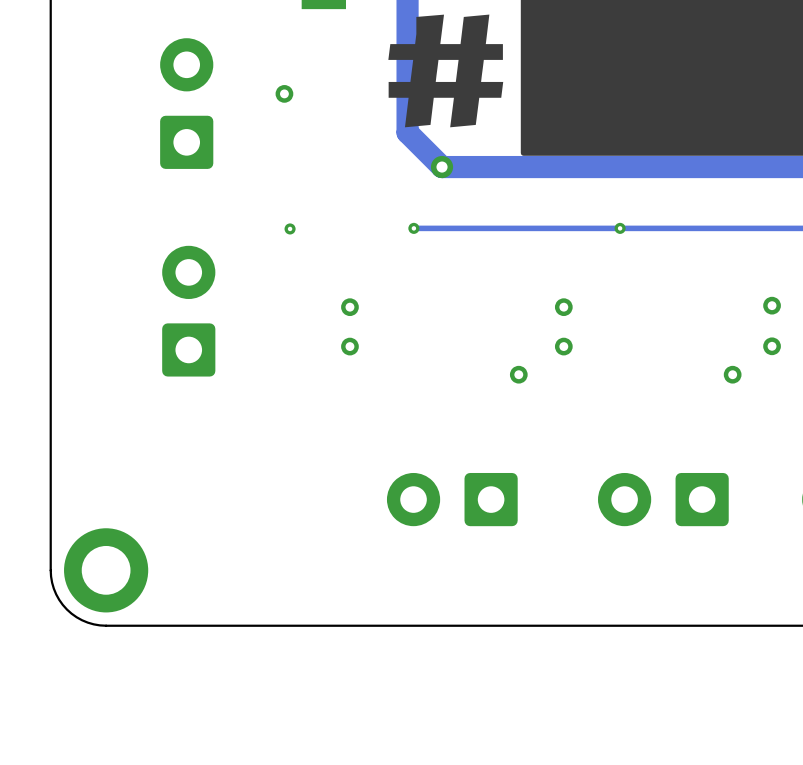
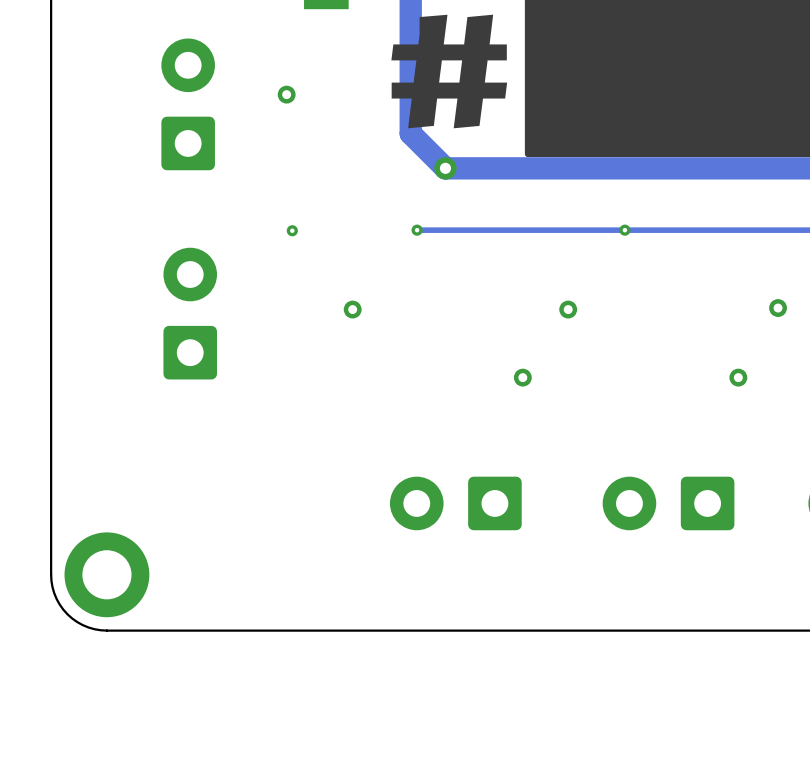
via: (349, 346) -> none
via: (563, 346) -> none
via: (772, 346) -> none

